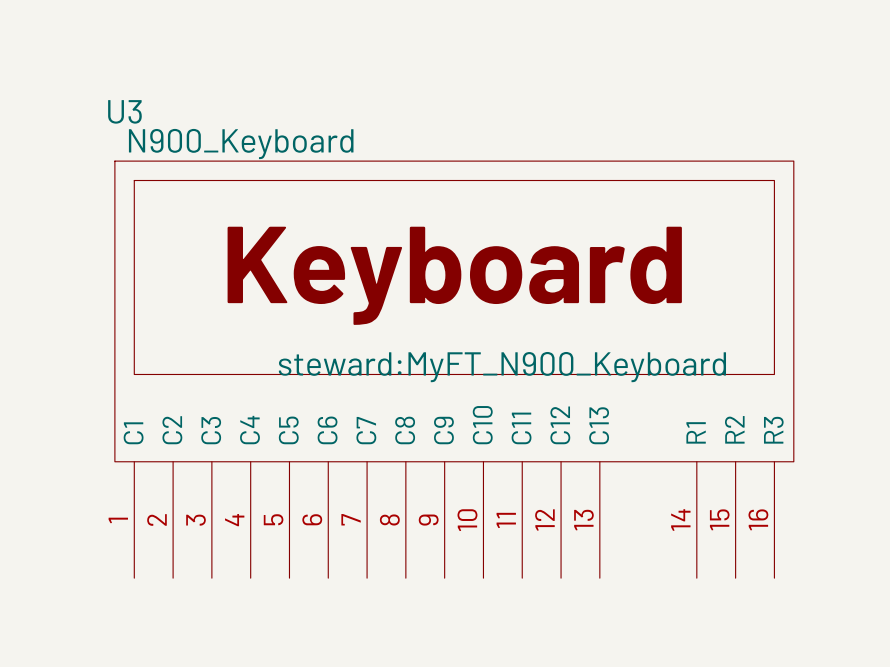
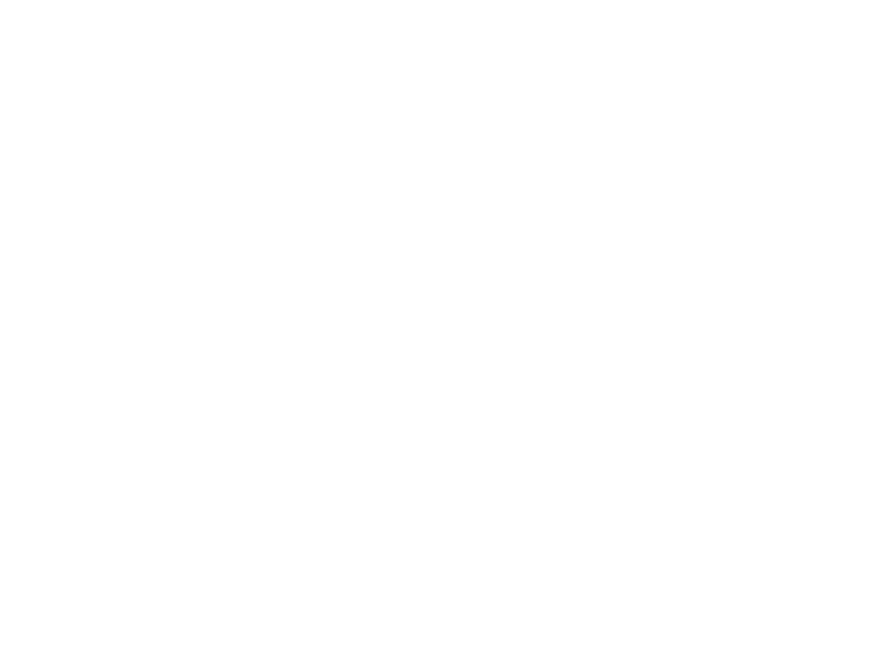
U3: N900_Keyboard (454, 369) -> none

